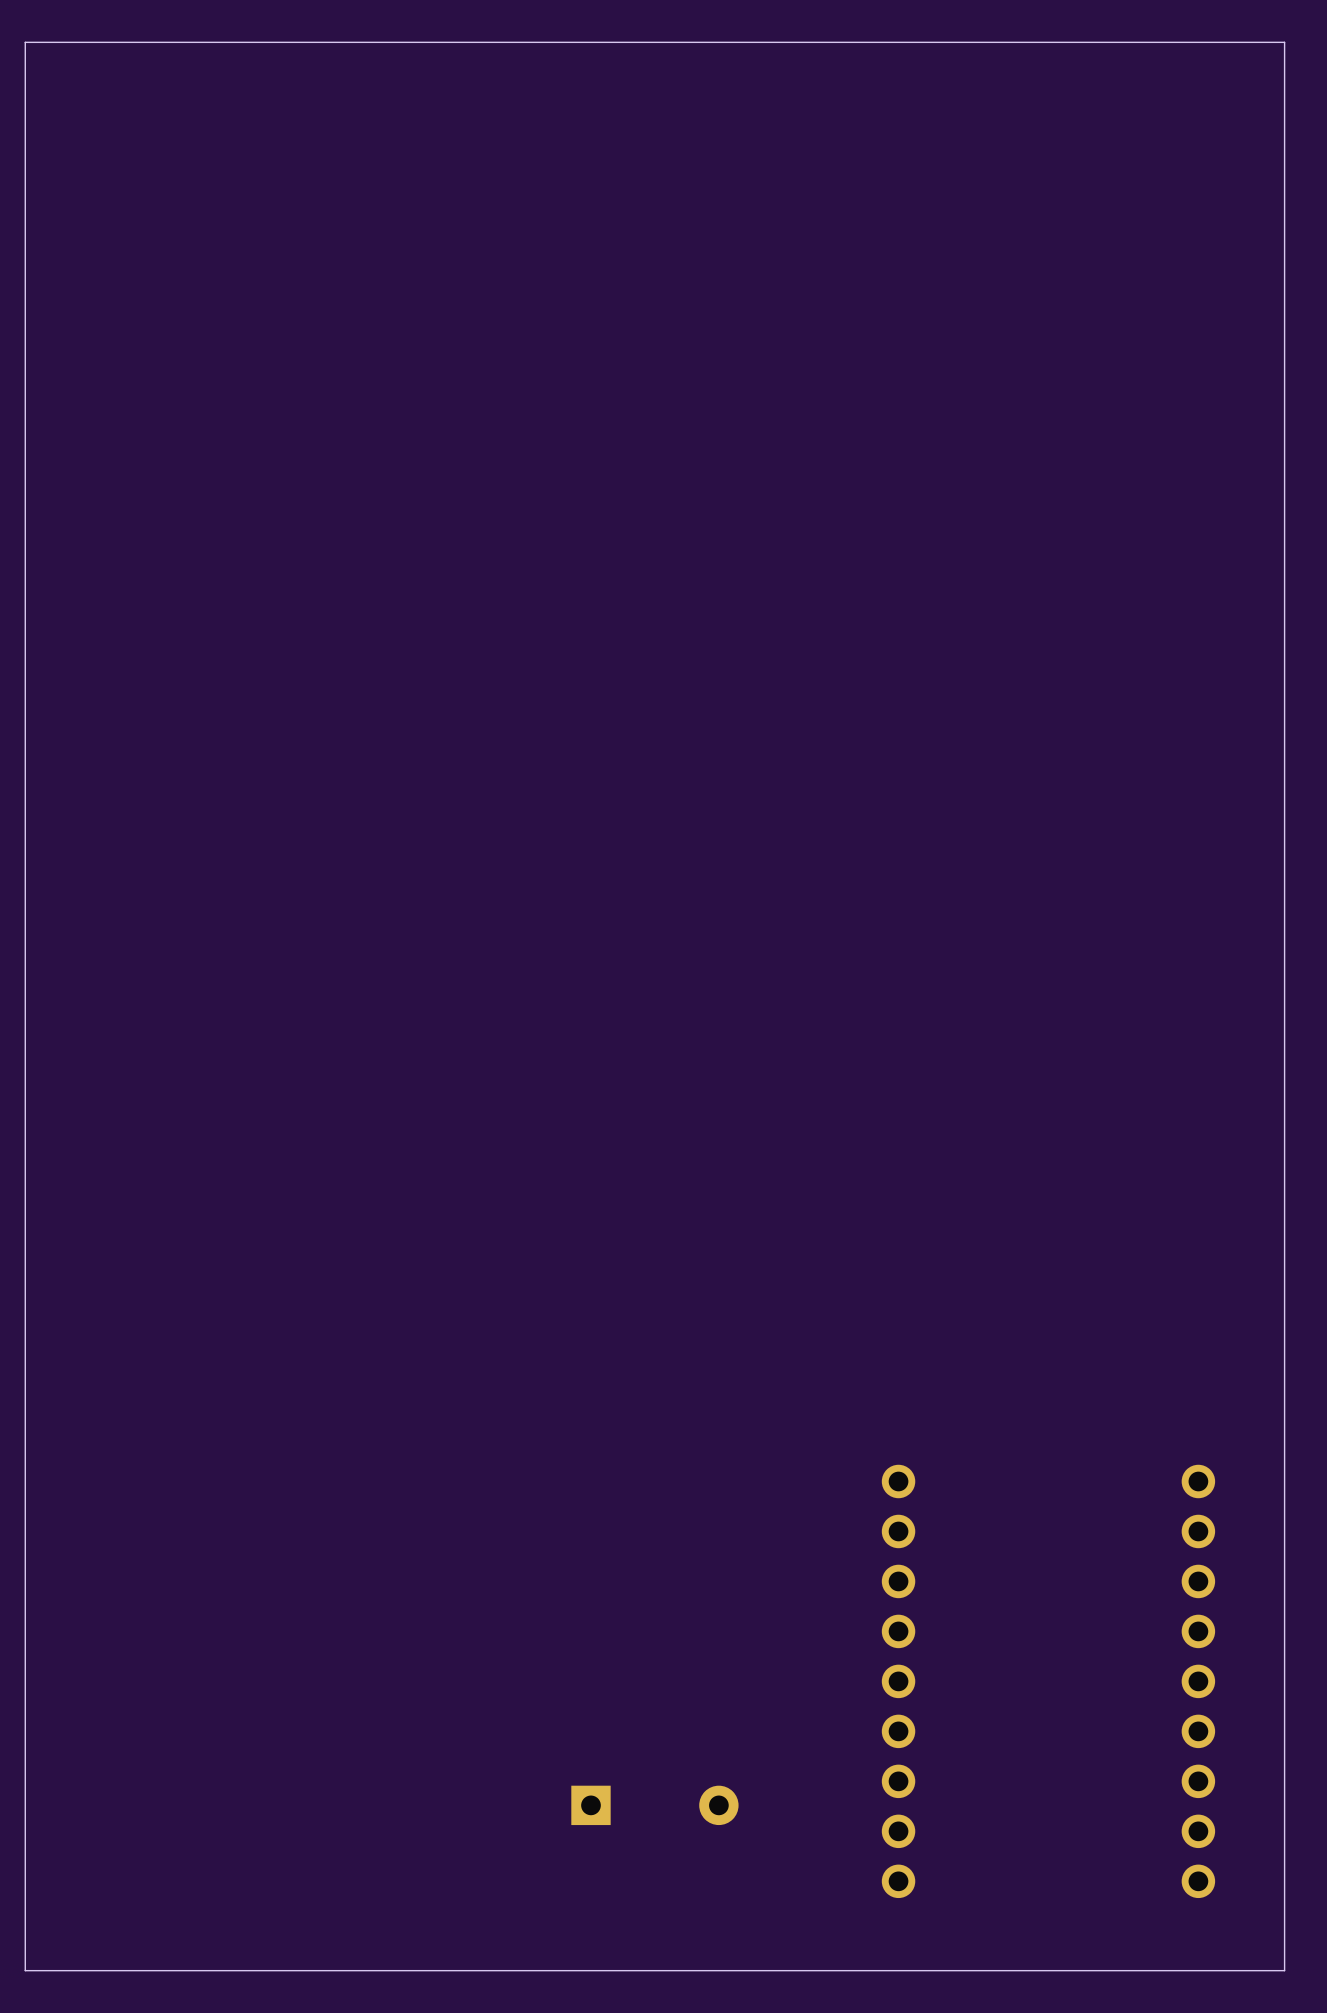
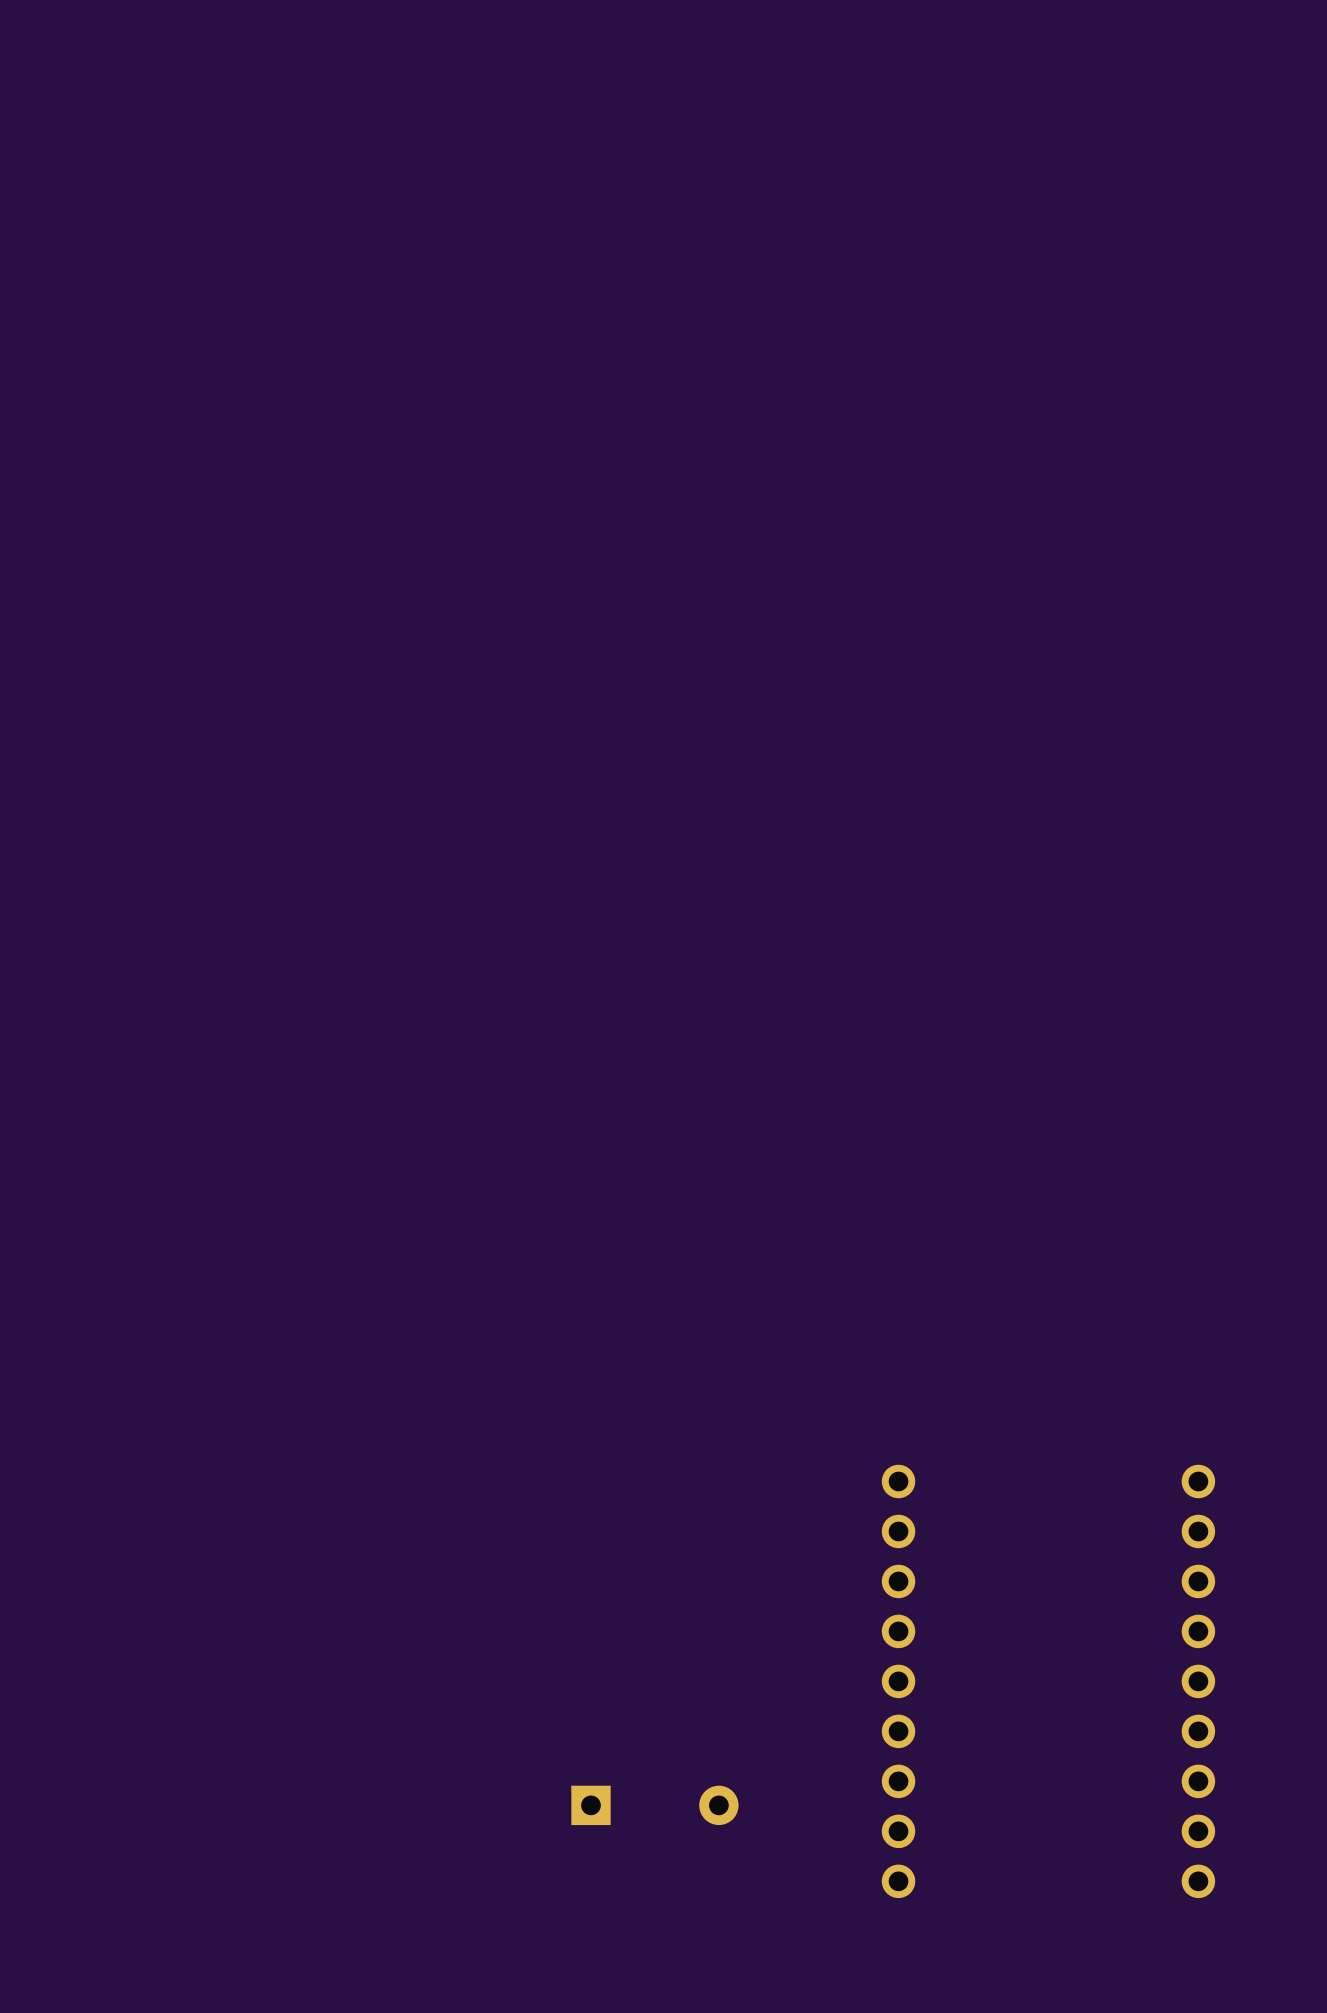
board edge: (1284, 42) (25, 42) (25, 1970) (1284, 1970) (1284, 42) -> none

